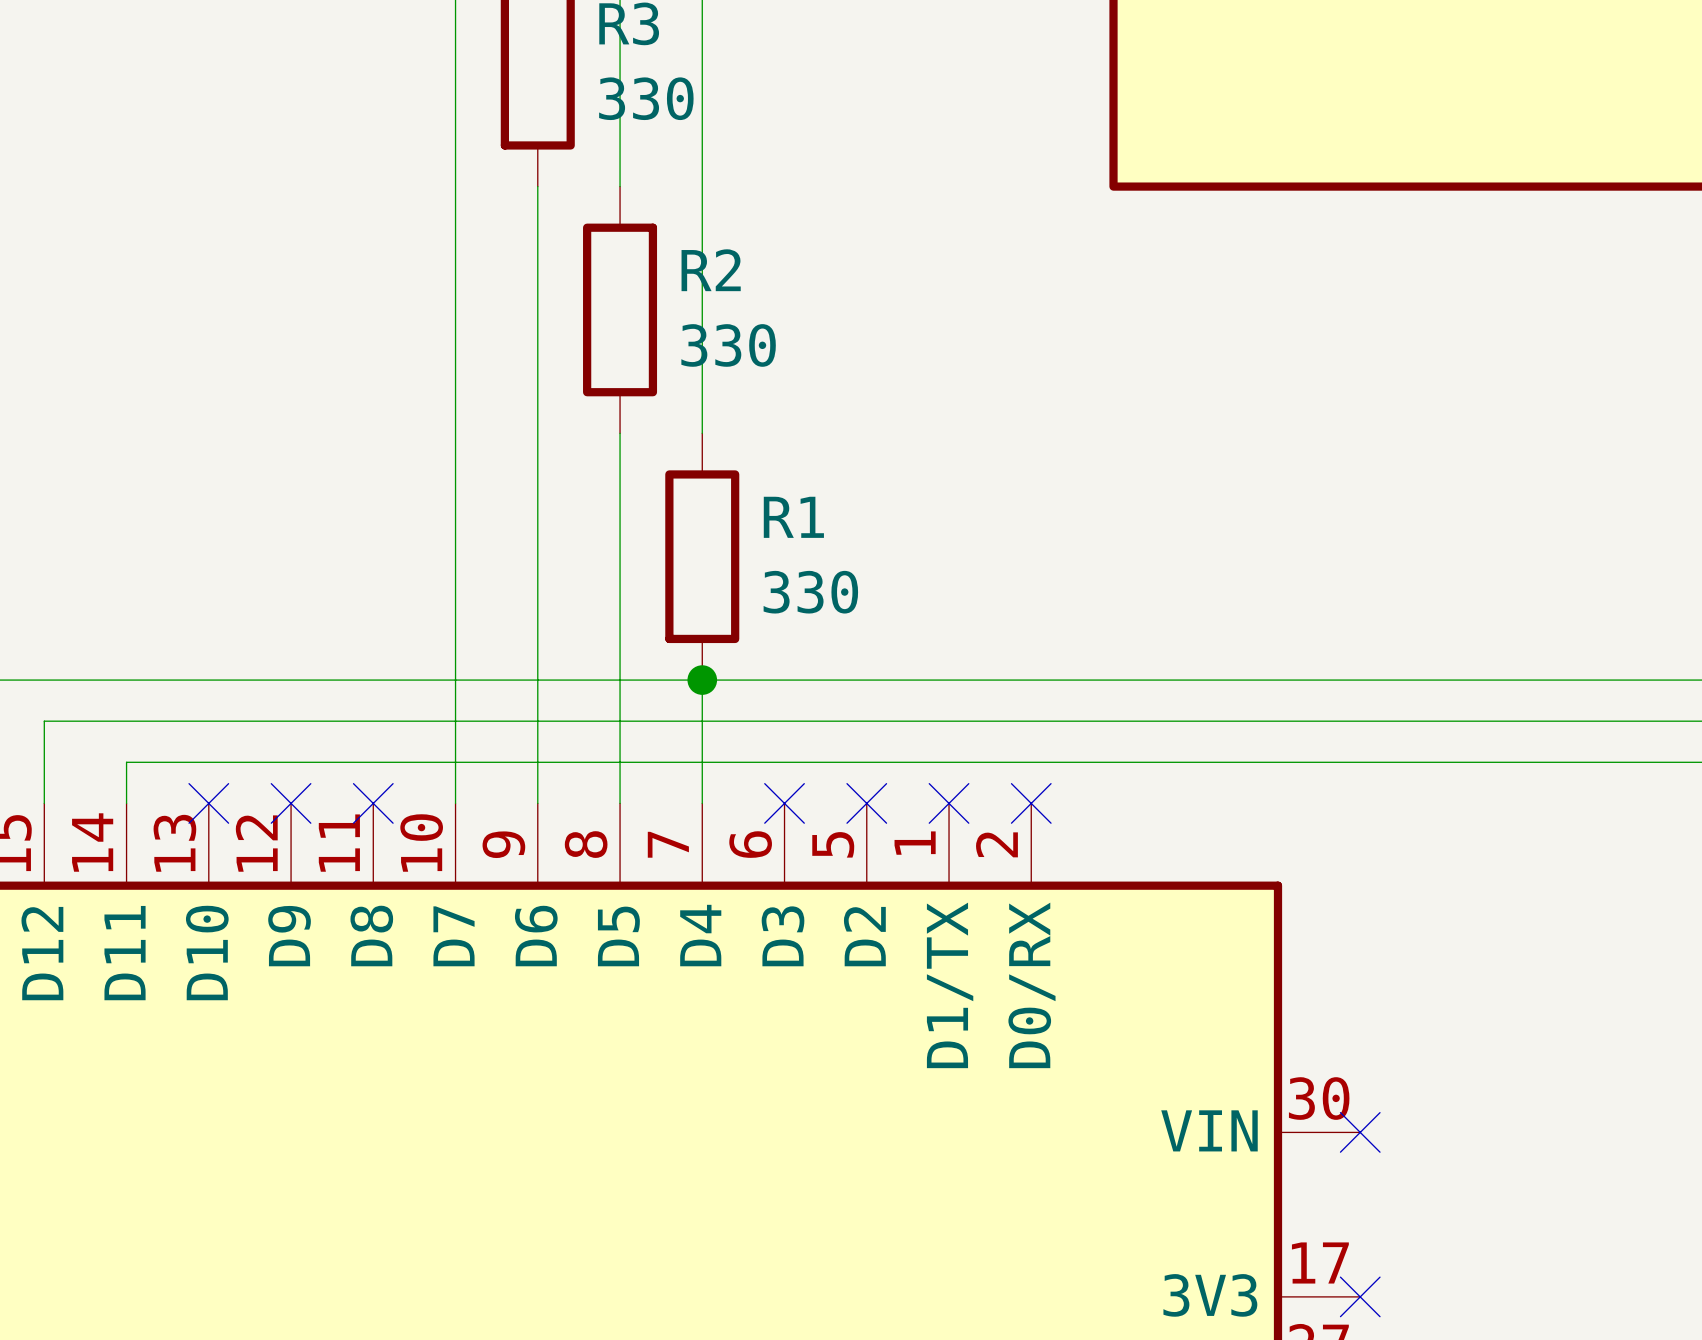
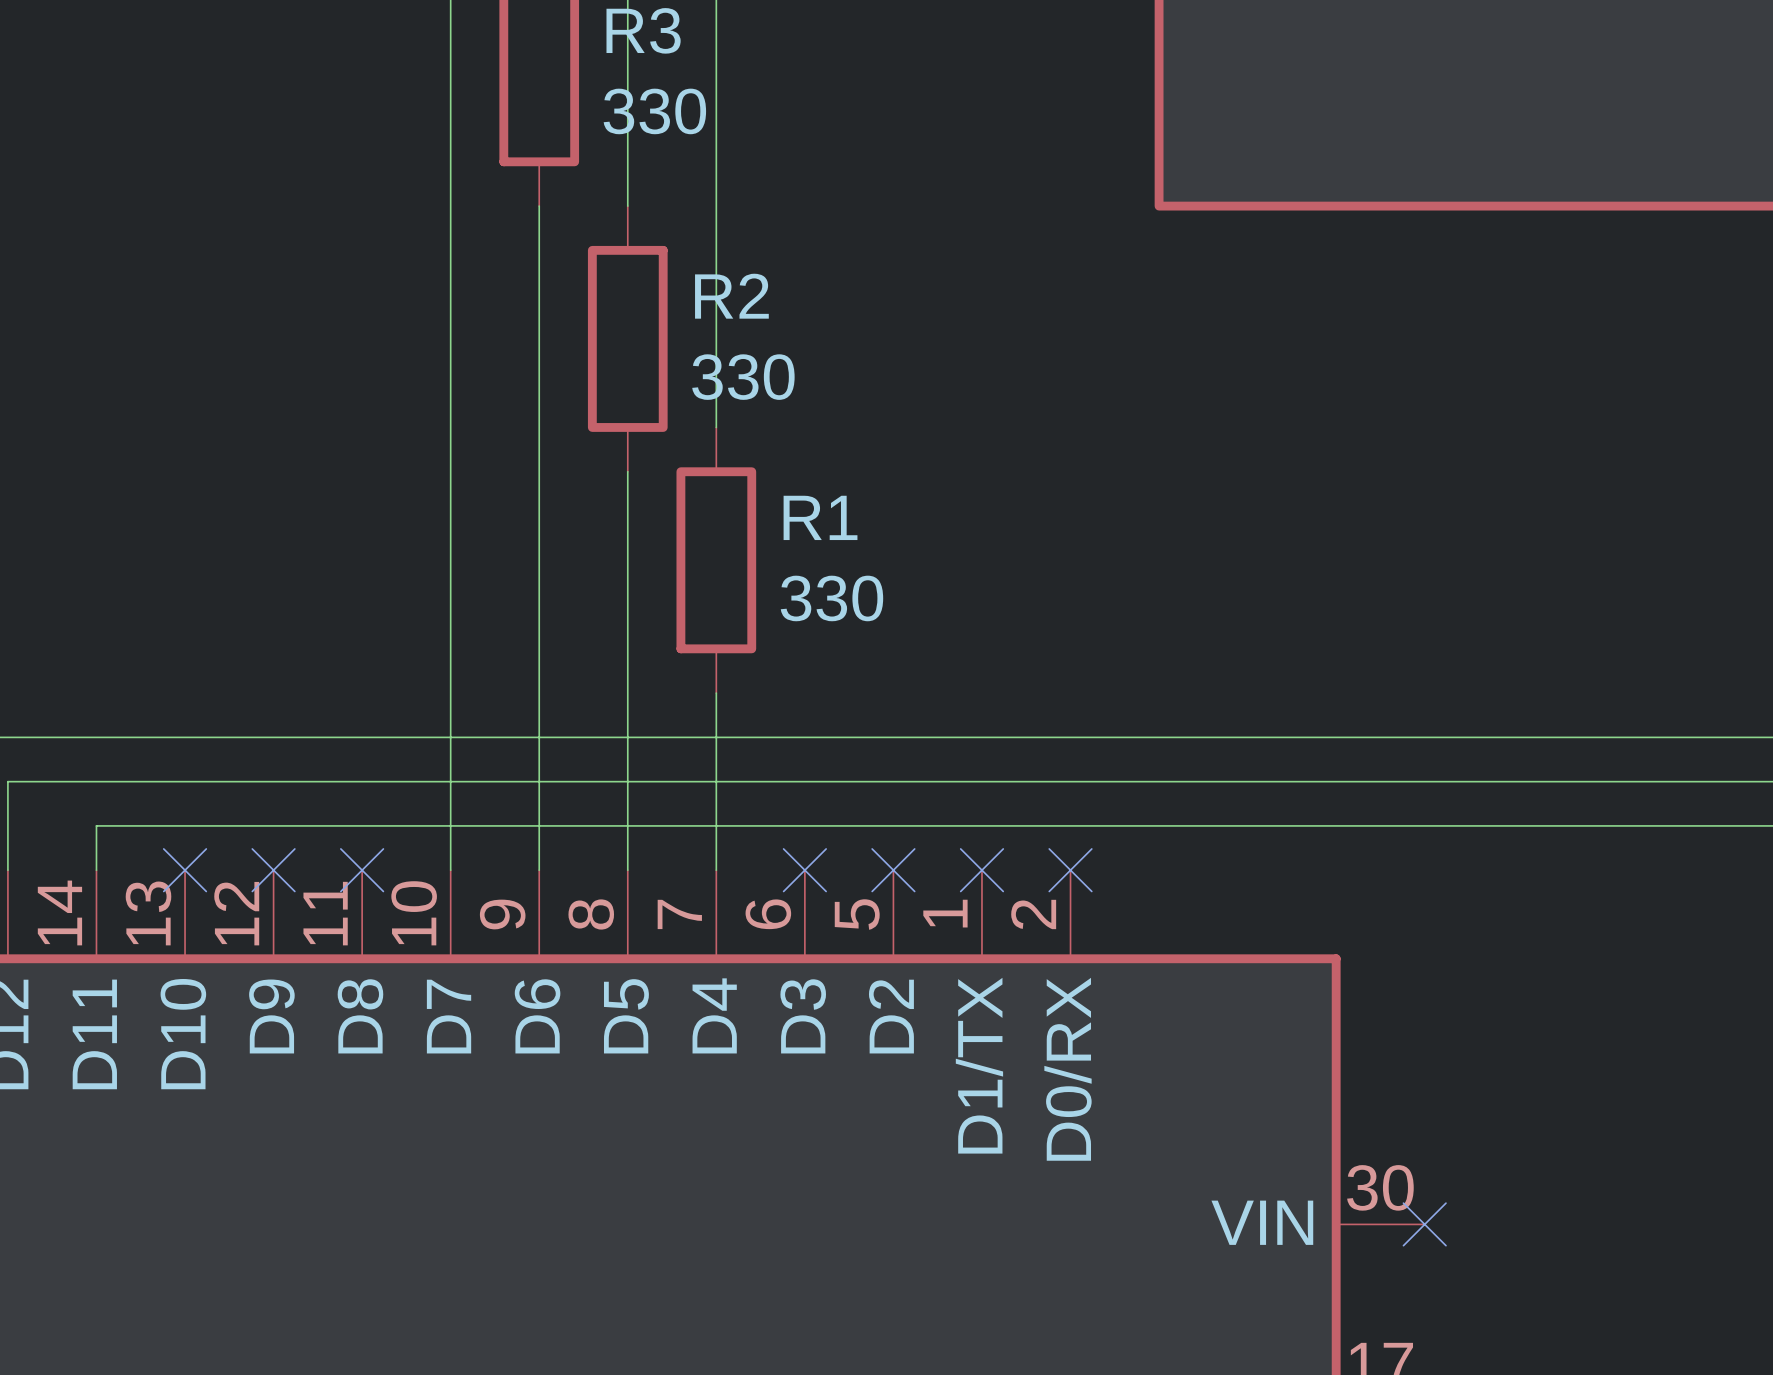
R1 position: (702, 556) -> (716, 560)
junction: (702, 680) -> none

